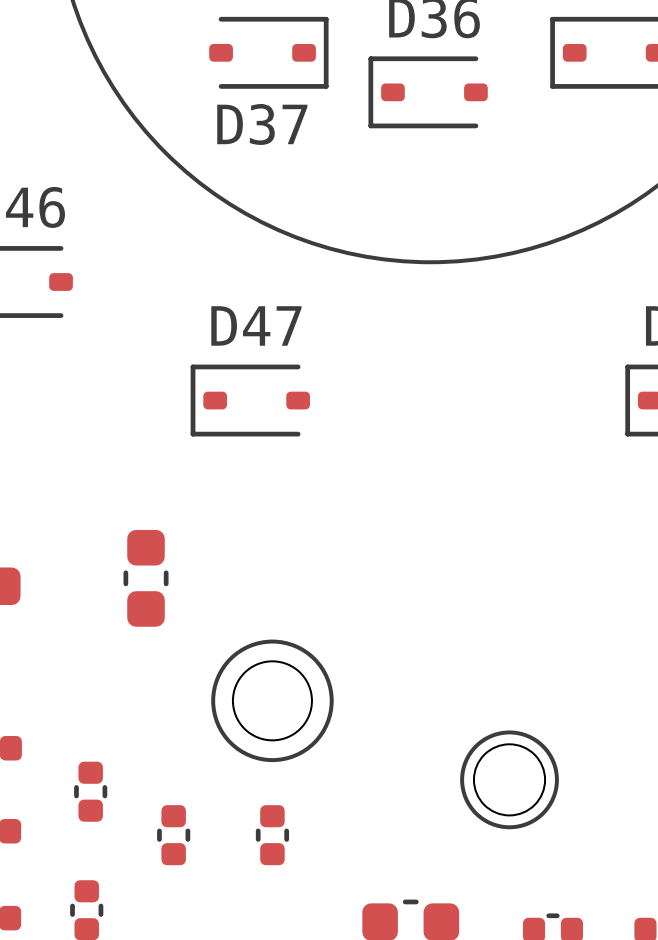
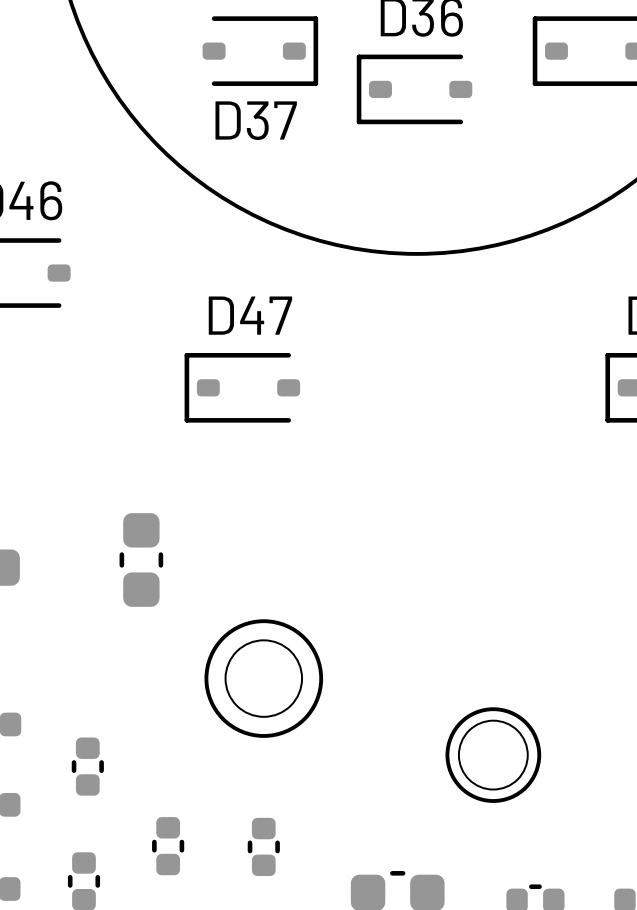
part position: (173, 835) -> (168, 846)
part position: (272, 835) -> (263, 846)

